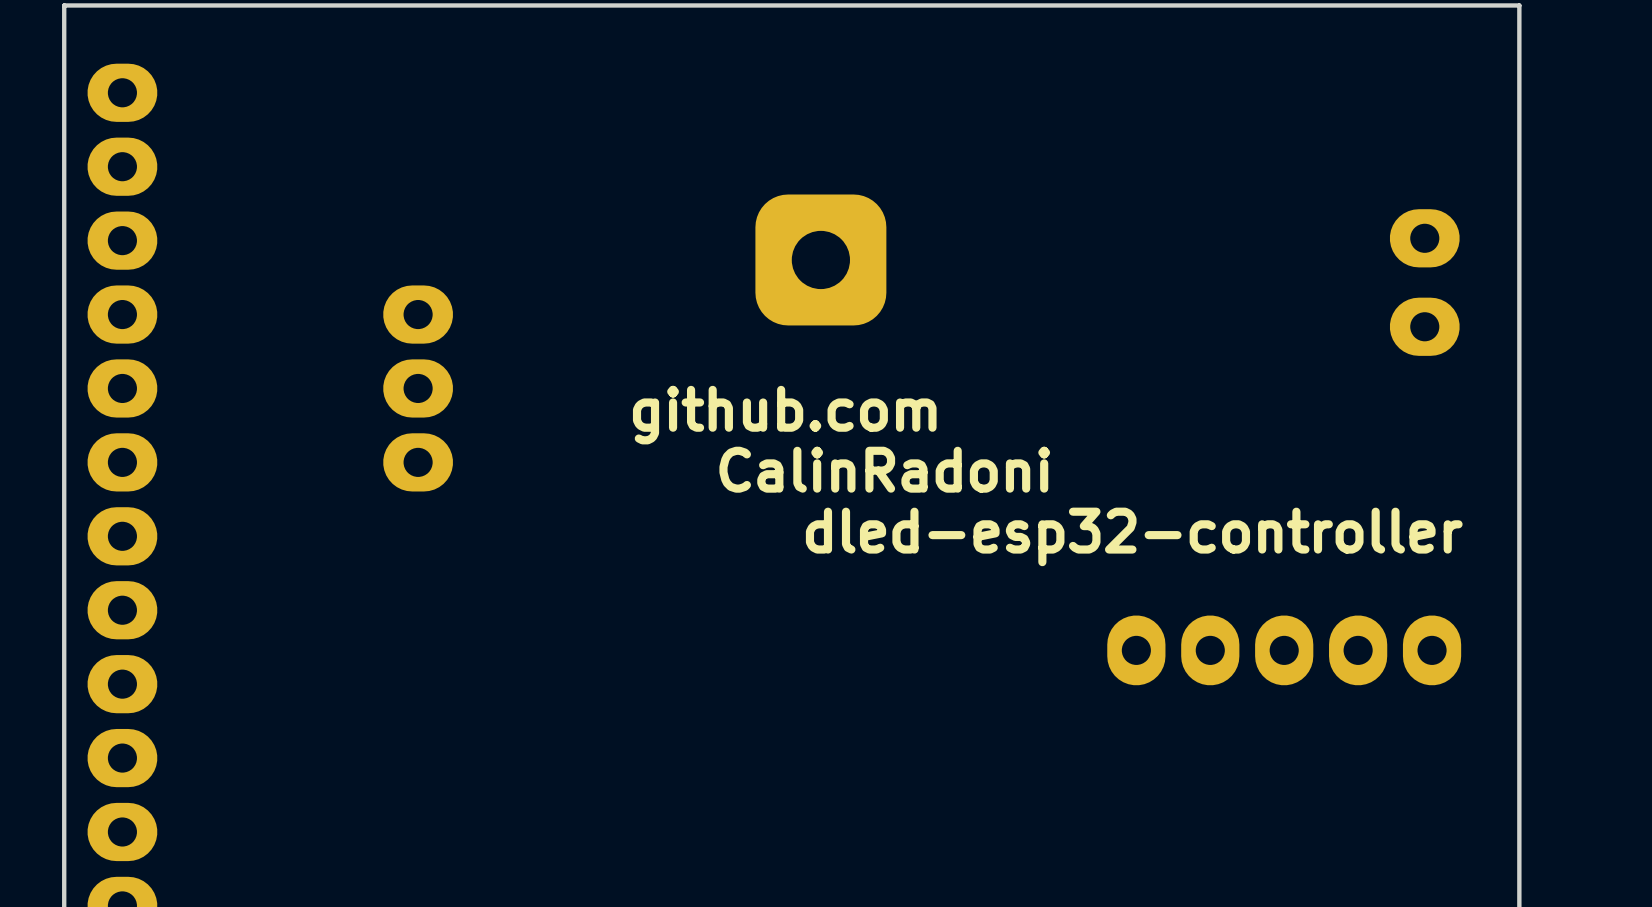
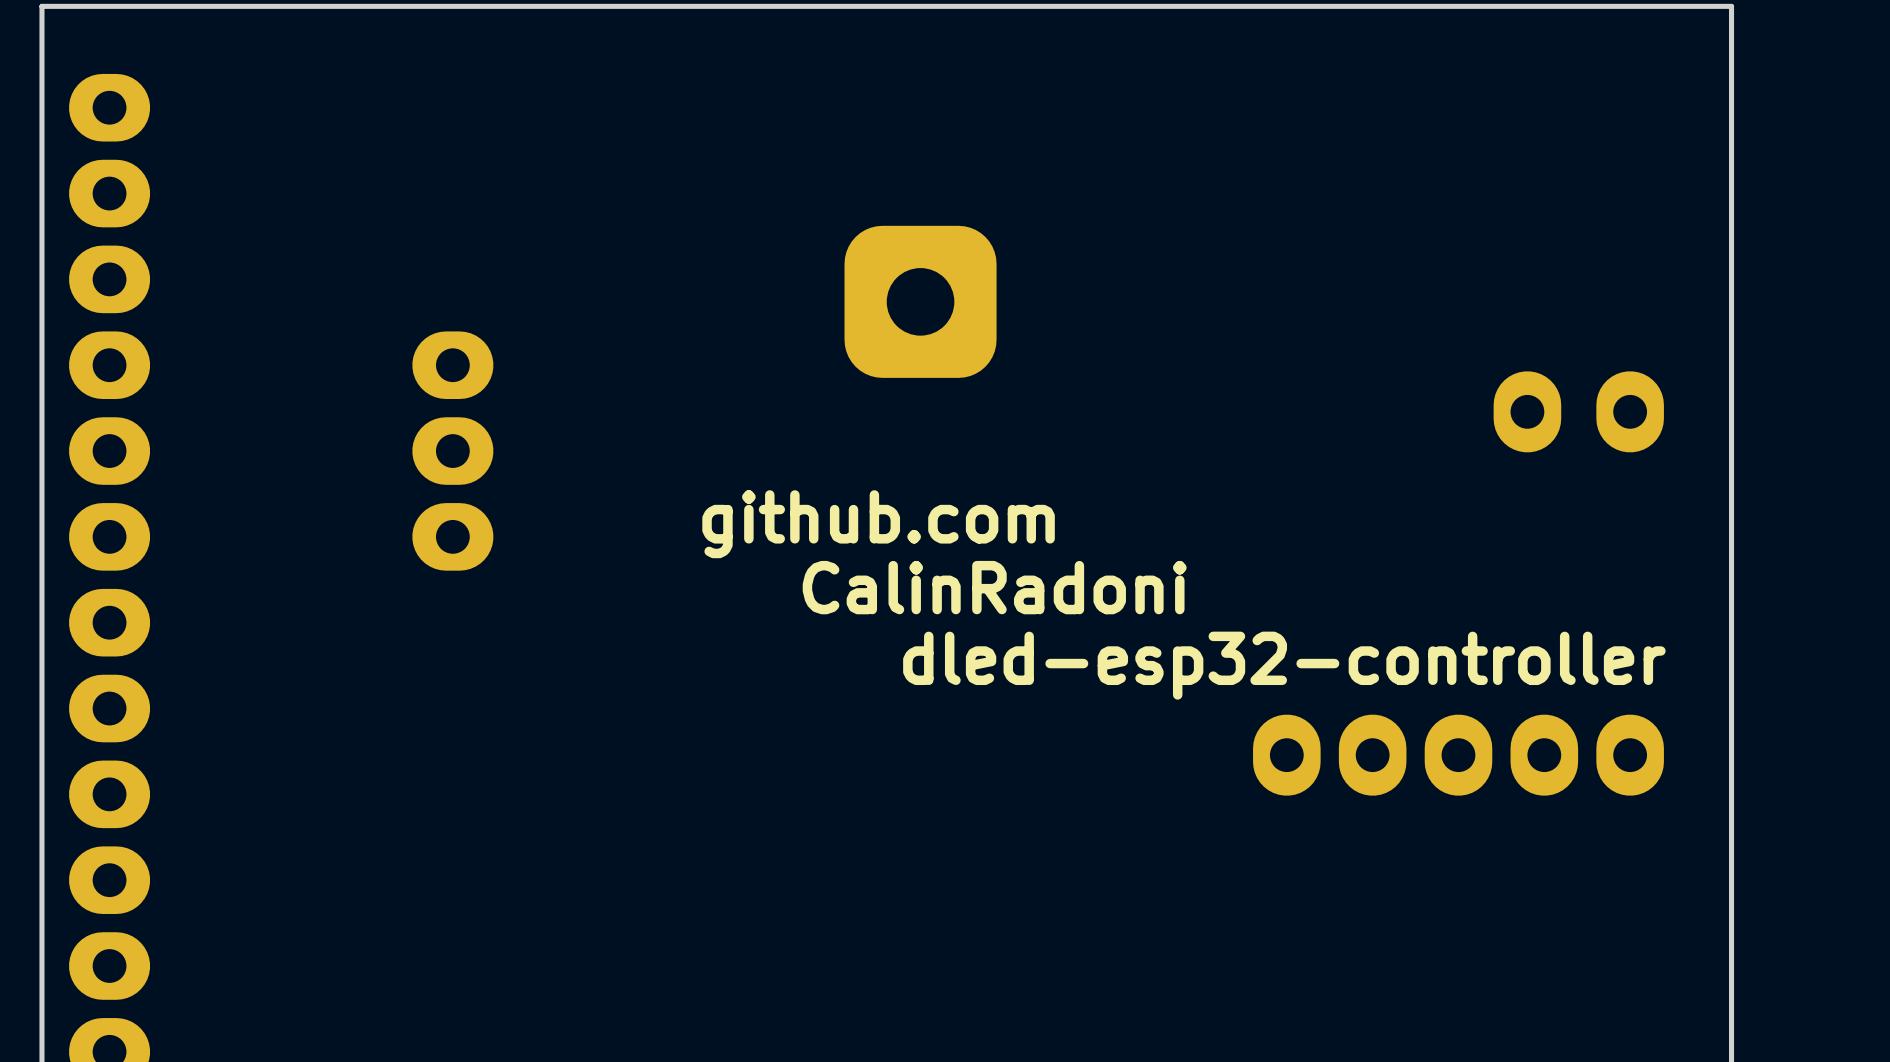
part rotation: 0° (1424, 282) -> 90° clockwise (1578, 411)
text position: github.com (784, 415) -> github.com (878, 524)
text position: CalinRadoni (884, 469) -> CalinRadoni (994, 587)
text position: dled-esp32-controller (1134, 536) -> dled-esp32-controller (1284, 665)

